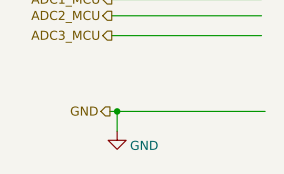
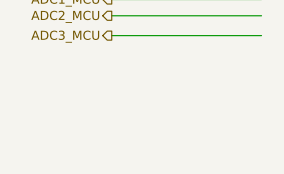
hierarchical label: GND (84, 111) -> none
wire: (109, 111) (265, 111) -> none
wire: (117, 111) (117, 131) -> none
junction: (117, 111) -> none
power symbol: GND (117, 140) -> none

